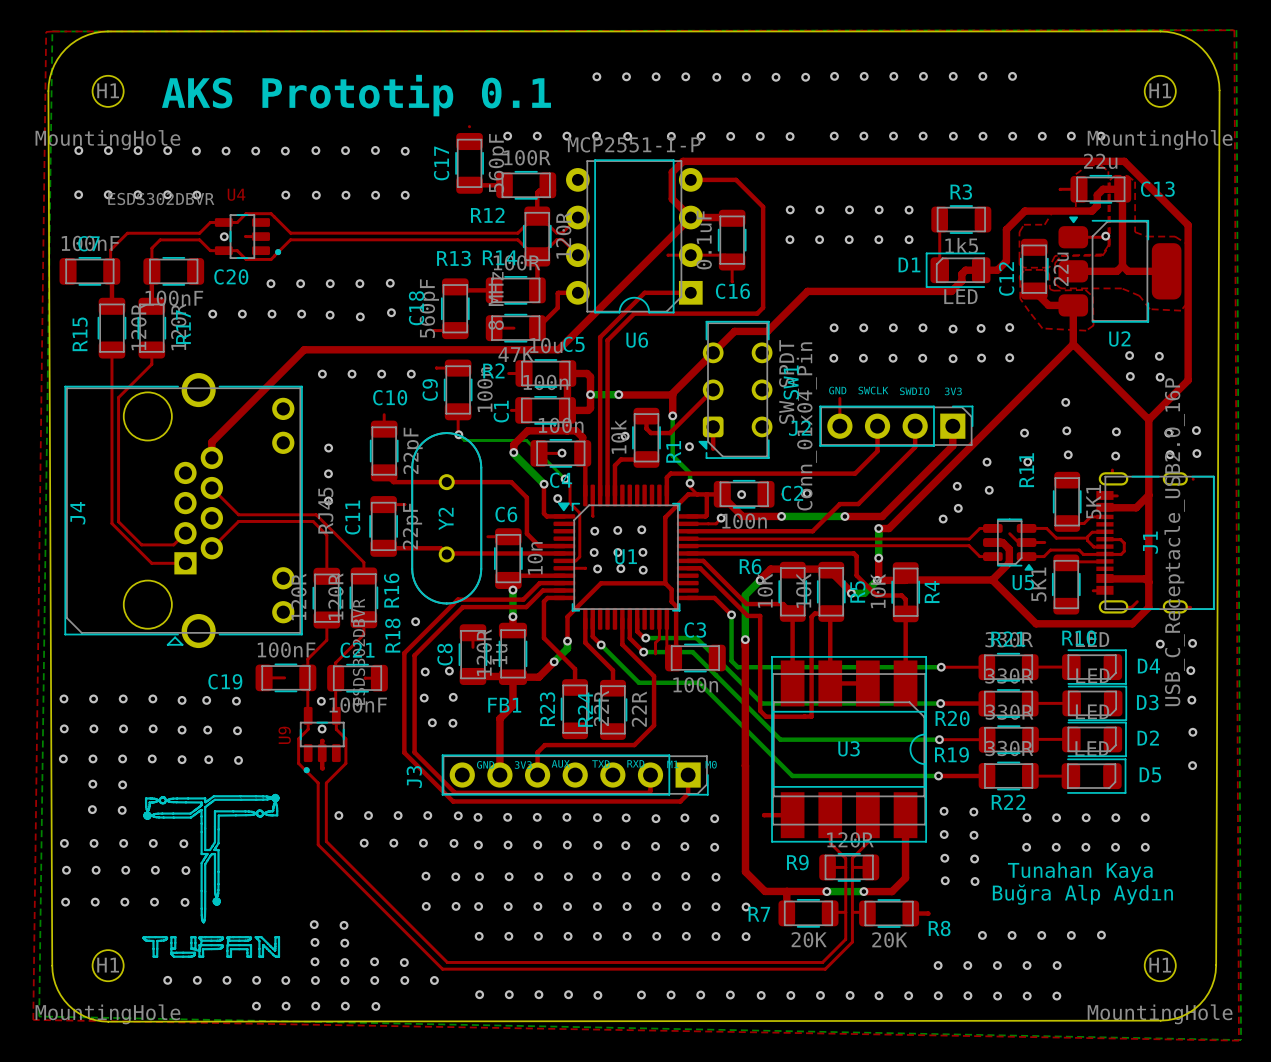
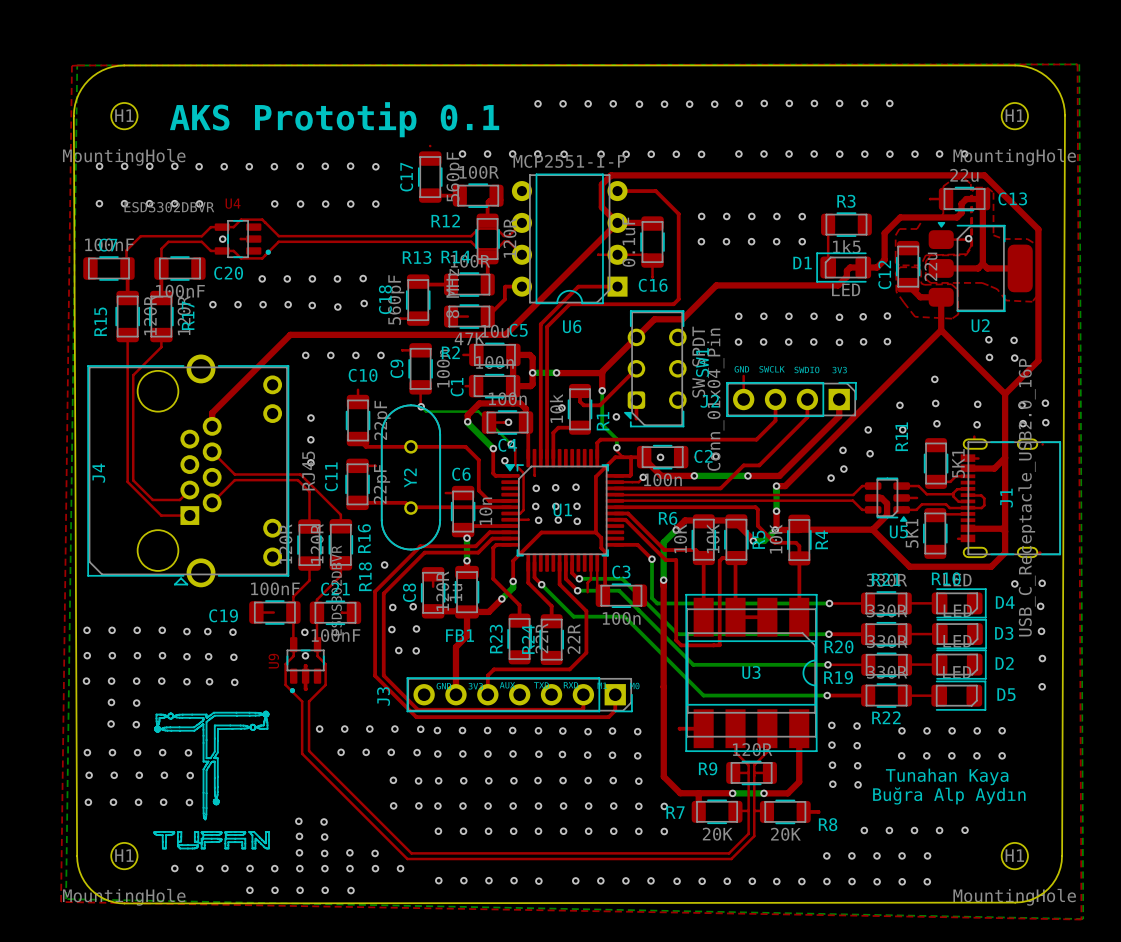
top track: (1009, 533) (1018, 542) -> none
top track: (1137, 601) (1131, 607) (1112, 607) -> none

